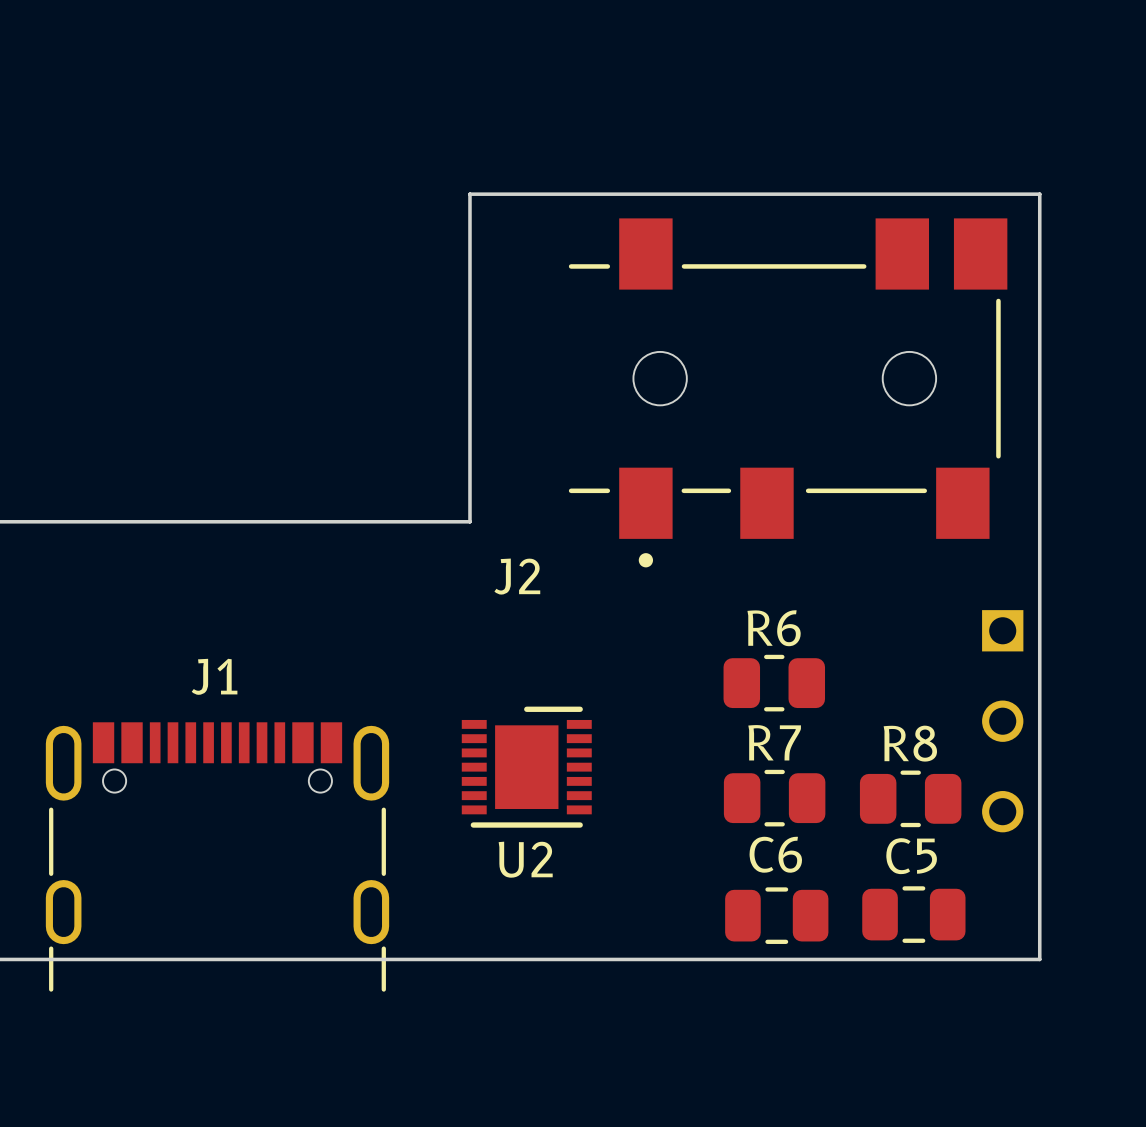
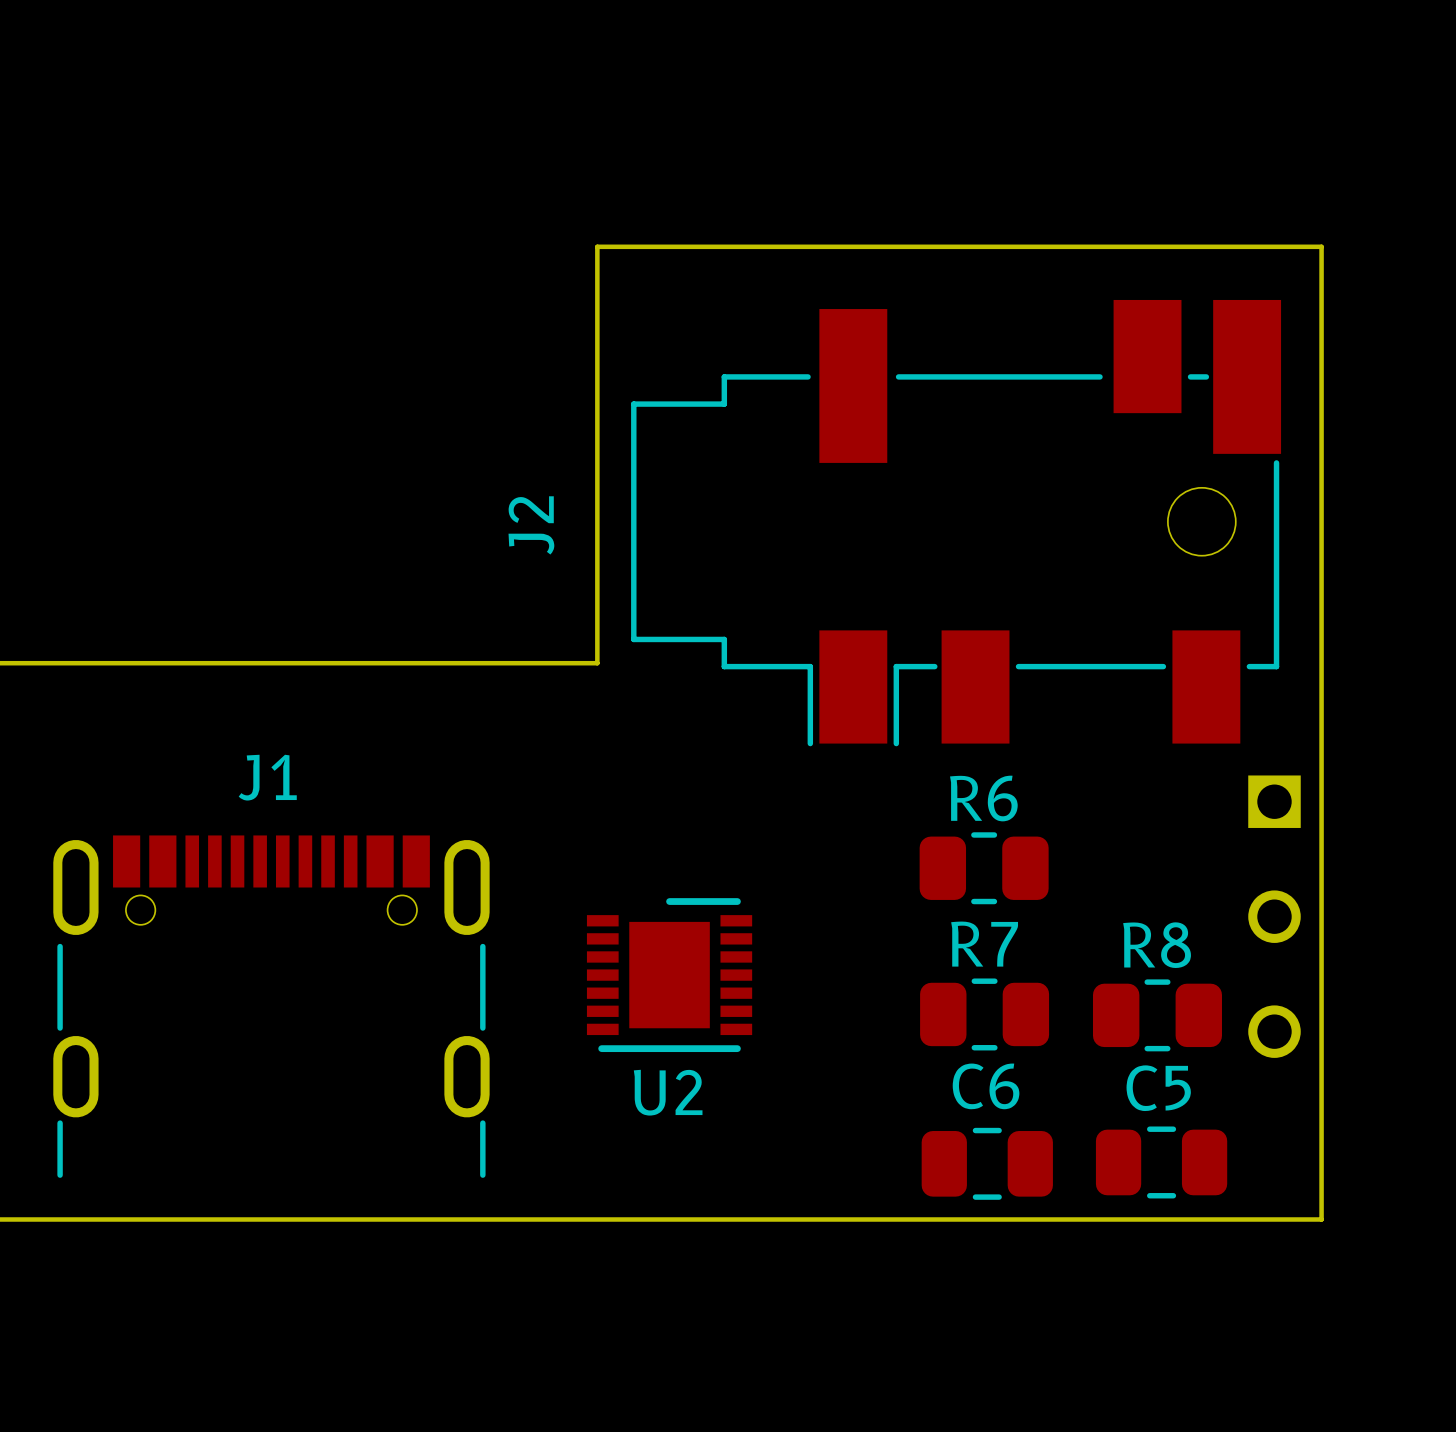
J2 footprint: [568, 218, 1008, 568] -> [631, 299, 1282, 747]
J2 name position: J2 (517, 576) -> J2 (531, 525)
J1 position: (217, 856) -> (271, 1006)

